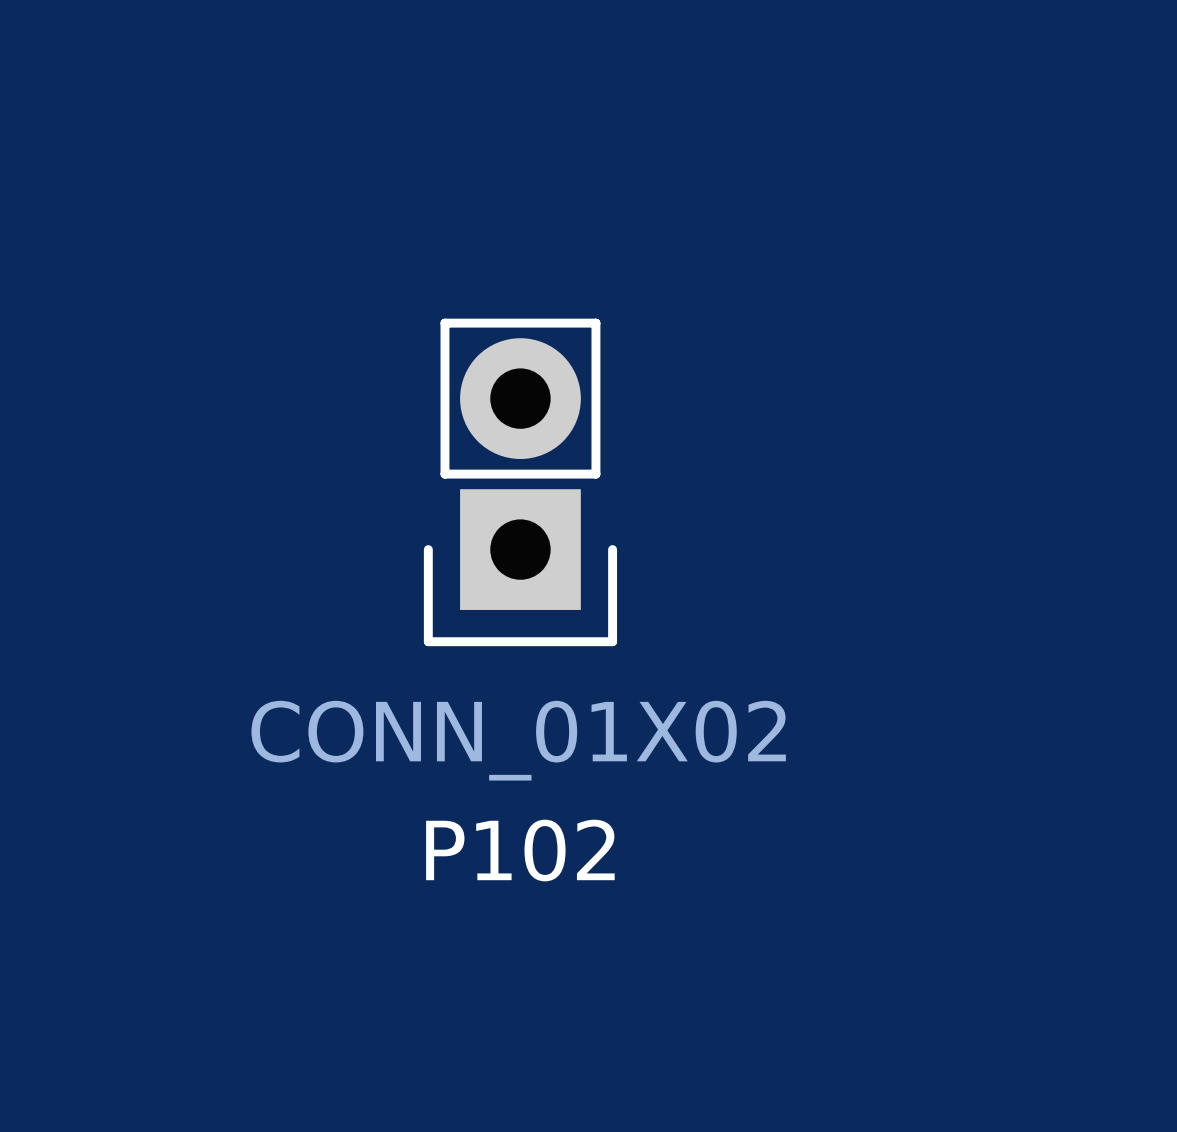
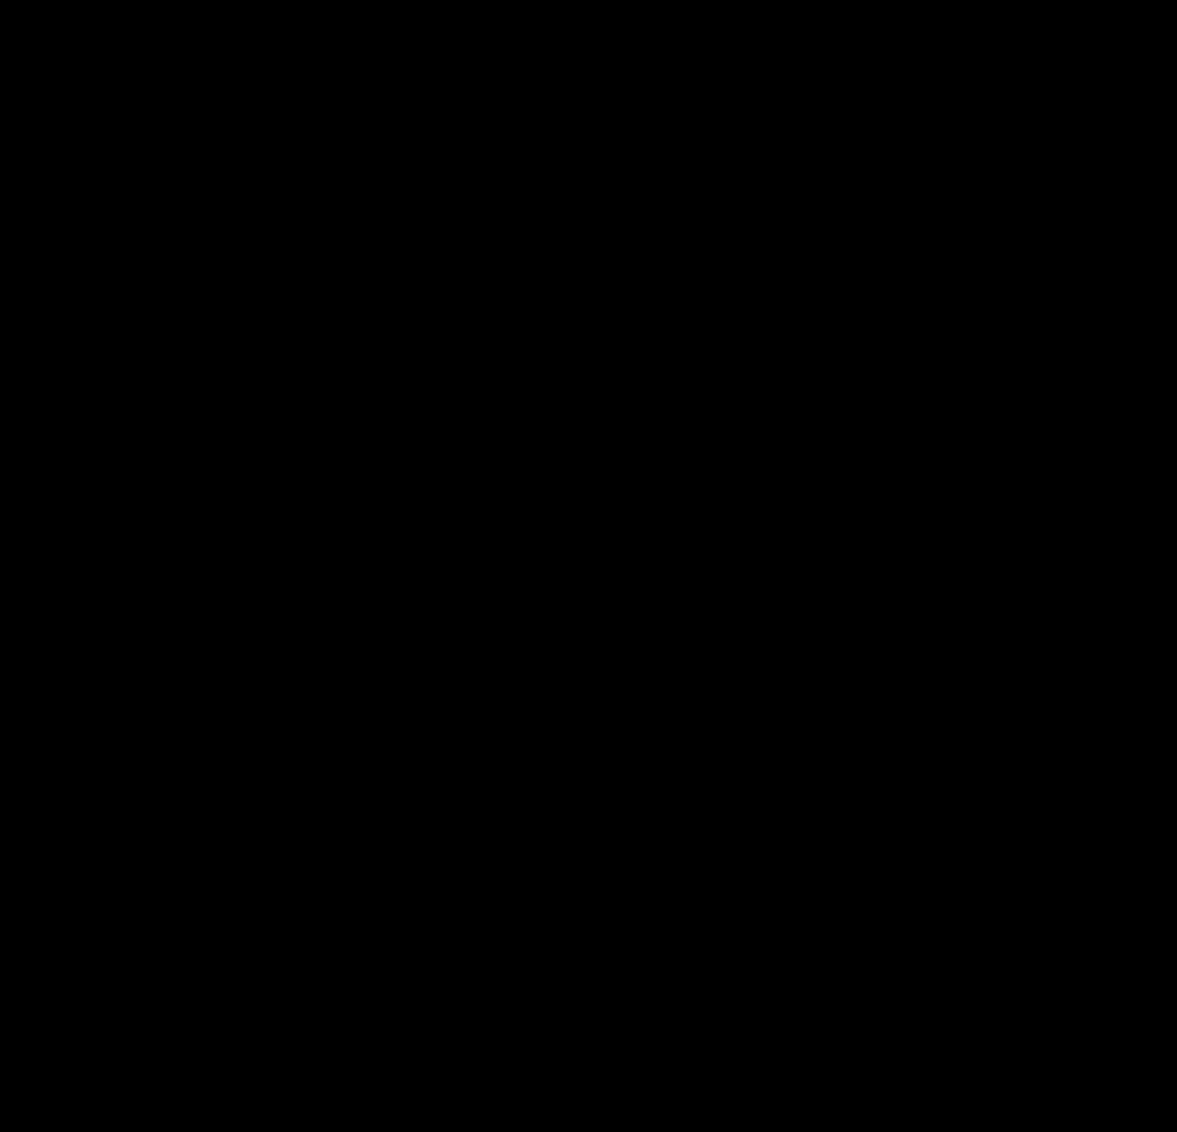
P102: CONN_01X02 (520, 482) -> none

